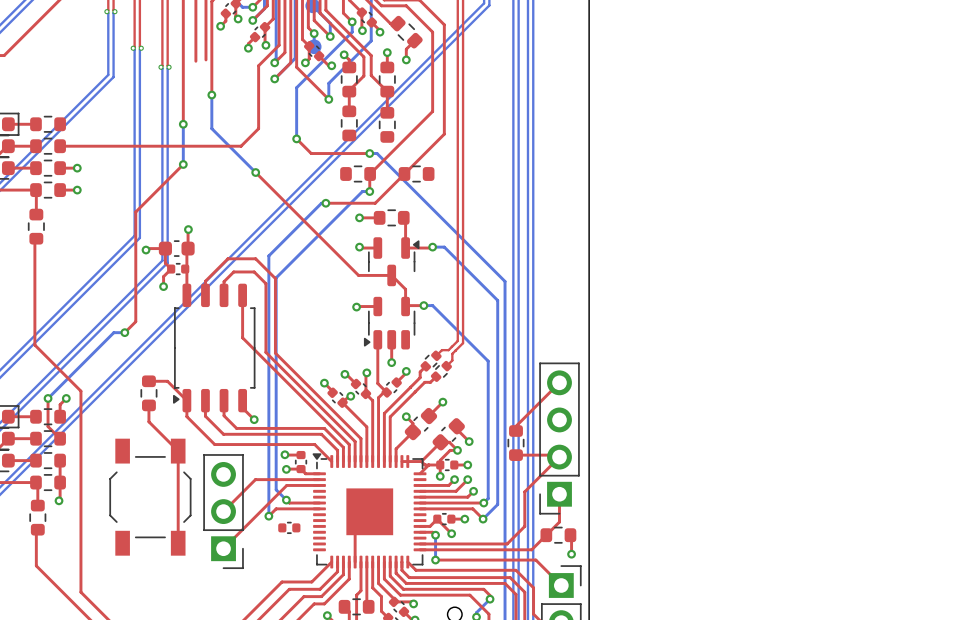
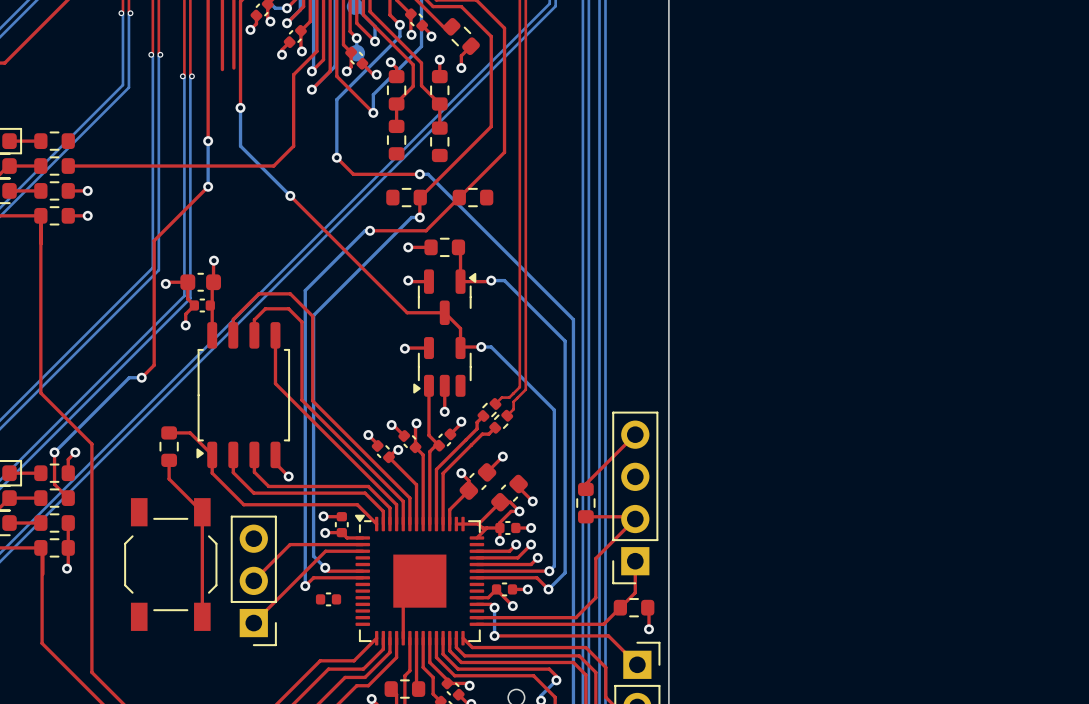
part: (36, 226) -> none
top track: (36, 238) (35, 346) -> (40, 215) (40, 393)
part: (37, 517) -> none
top track: (37, 529) (37, 566) -> (42, 549) (42, 643)

